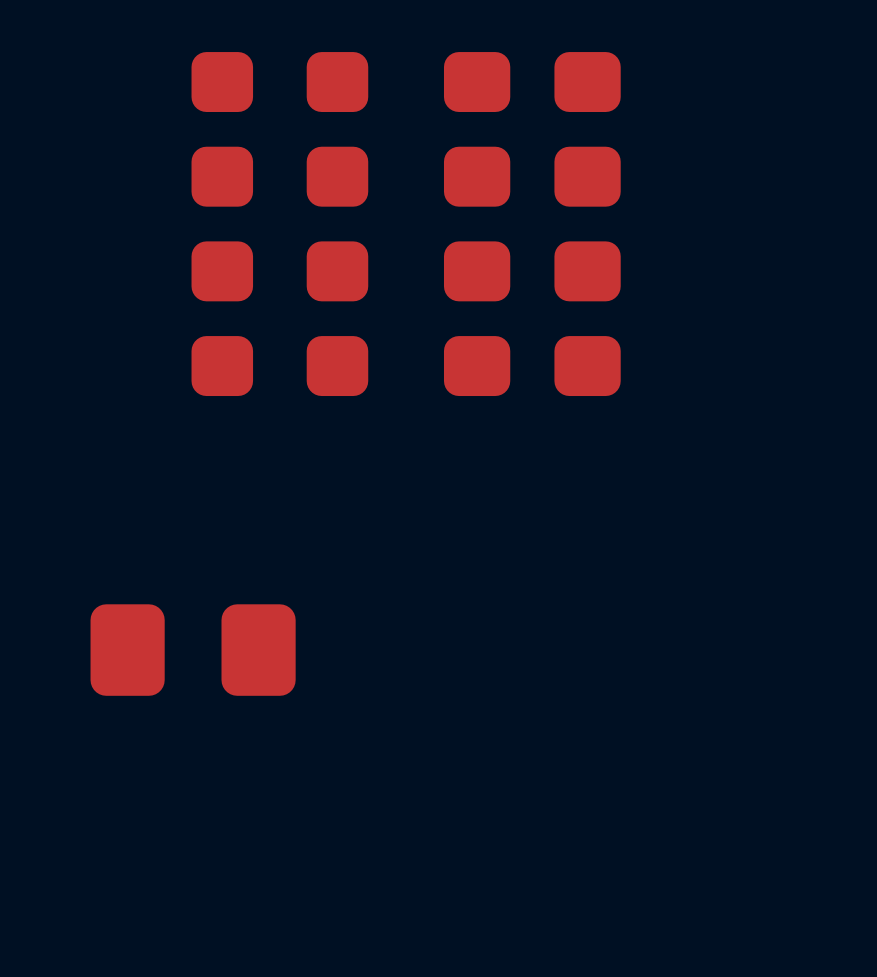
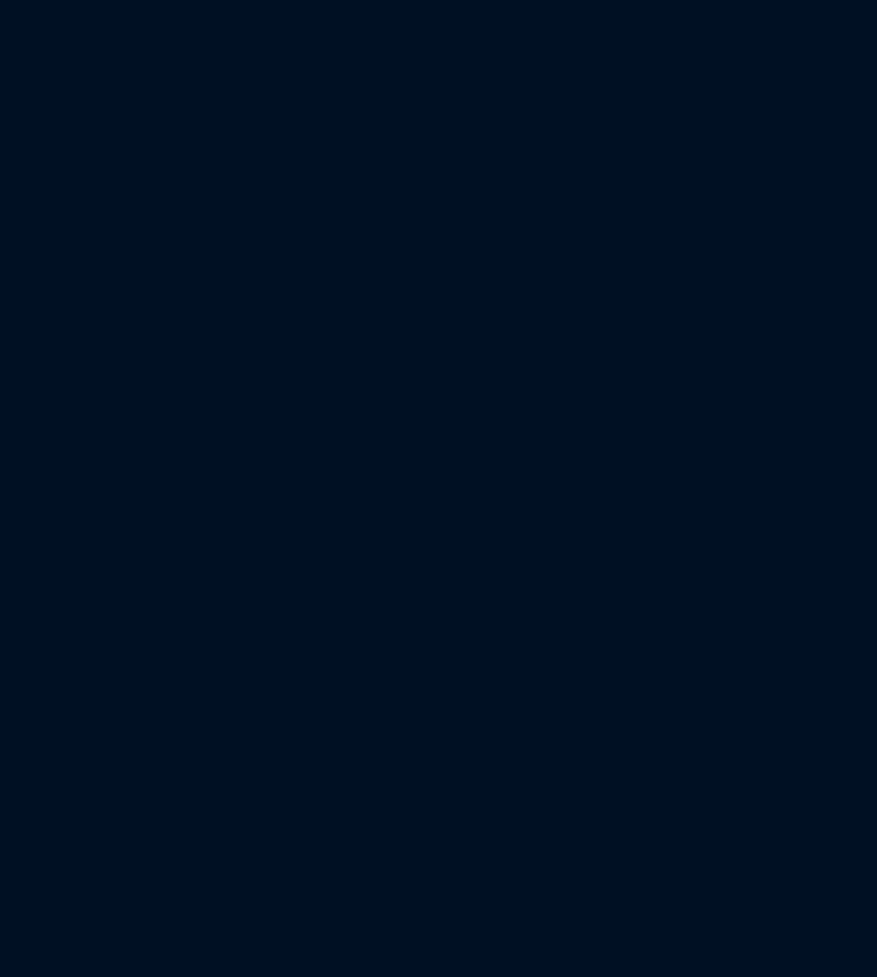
part: (279, 82) -> none
part: (532, 82) -> none
part: (279, 176) -> none
part: (532, 176) -> none
part: (279, 271) -> none
part: (532, 271) -> none
part: (279, 366) -> none
part: (532, 366) -> none
part: (193, 650) -> none

